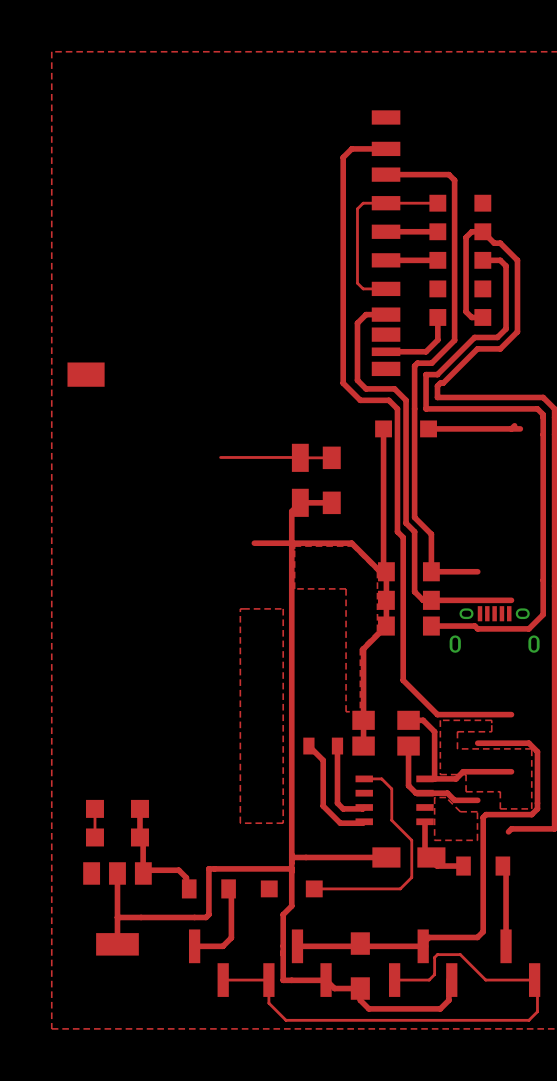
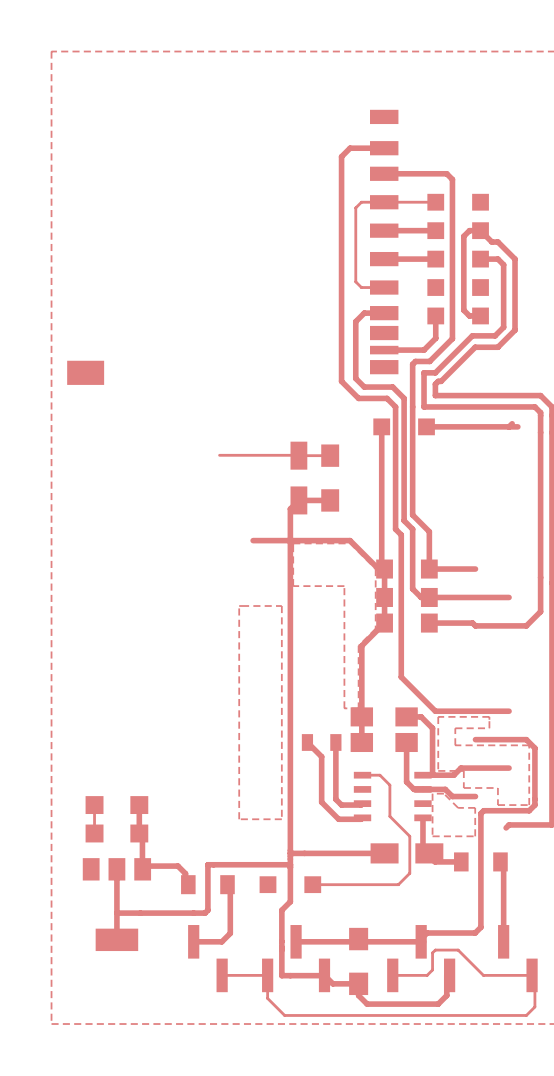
part: (494, 629) -> none

